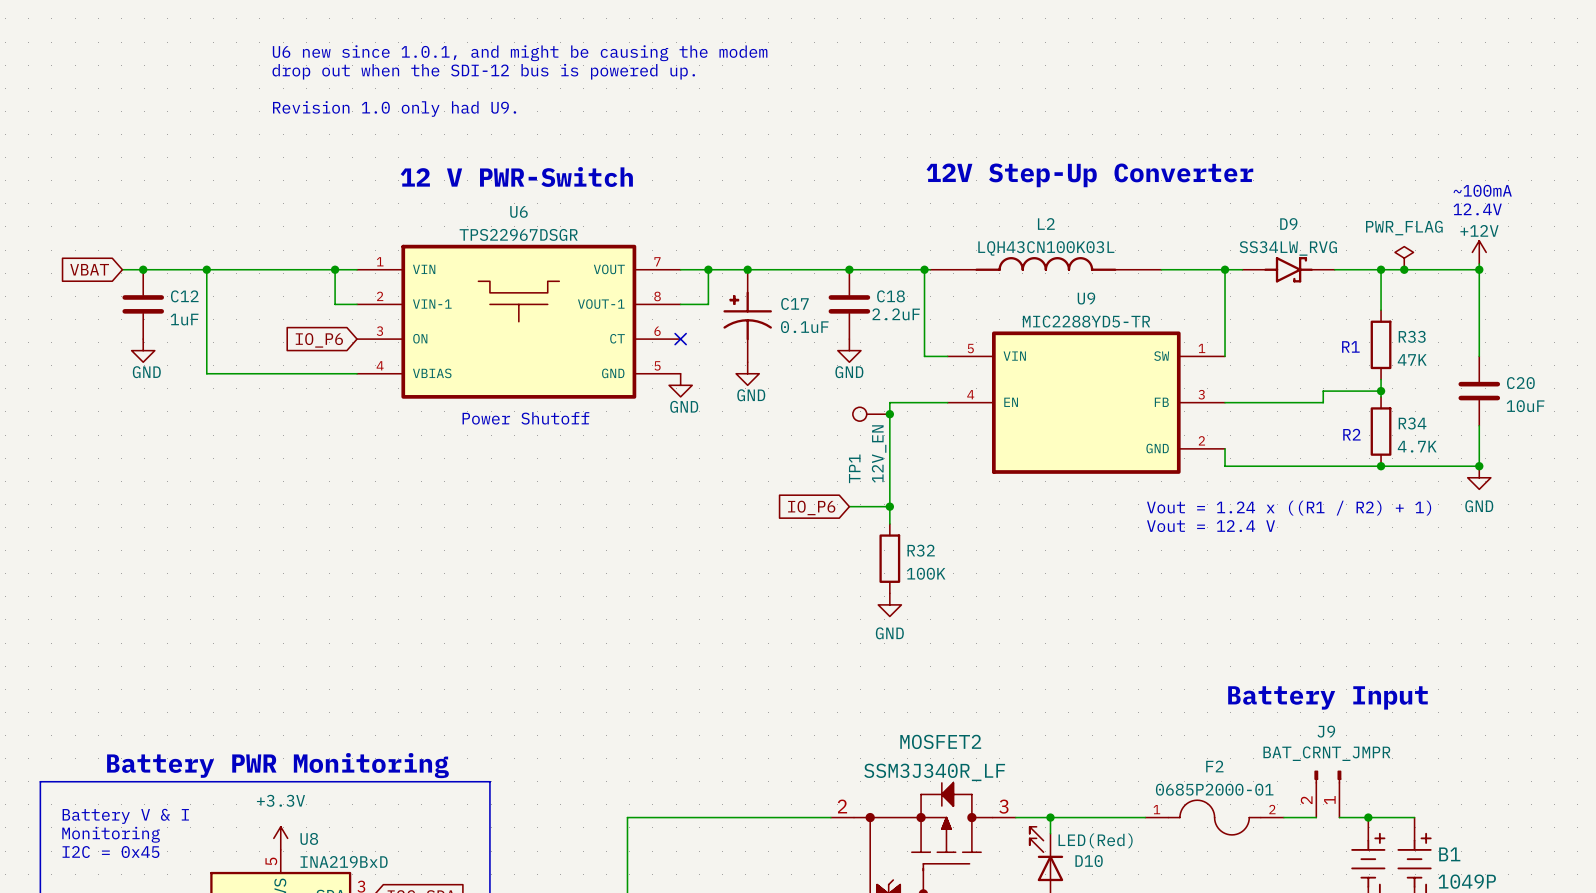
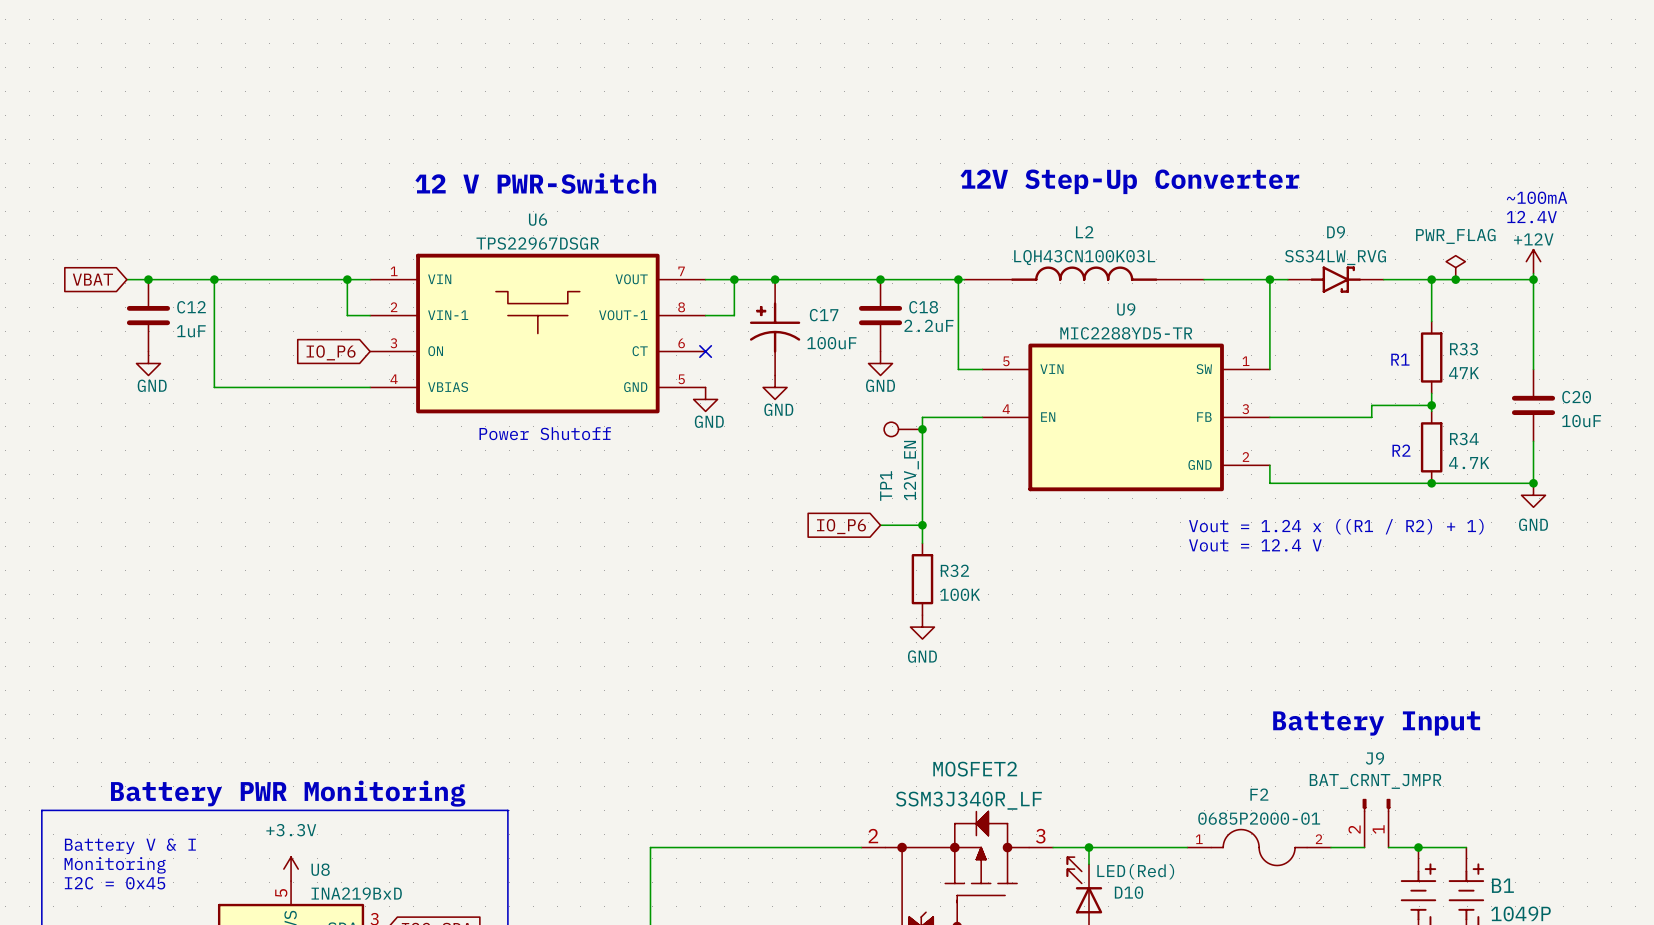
text: U6 new since 1.0.1, and might be causing the modem (520, 53) -> none
text: drop out when the SDI-12 bus is powered up. (483, 71) -> none
text: Revision 1.0 only had U9. (394, 108) -> none
C17 value: 0.1uF (804, 327) -> 100uF (831, 343)

